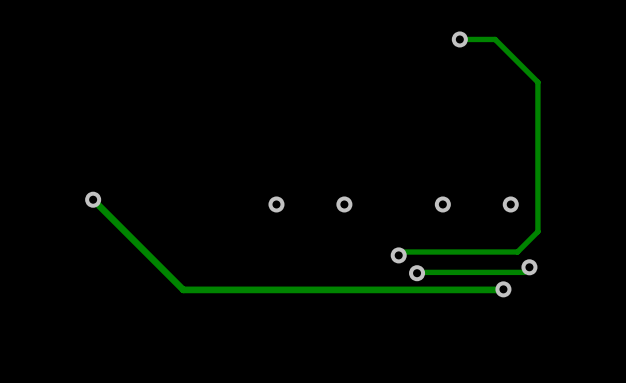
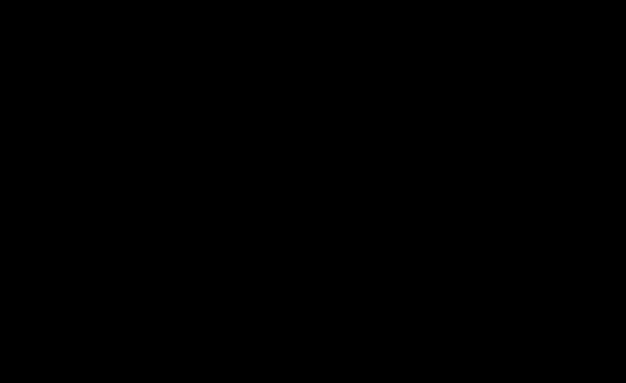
via: (459, 39) -> none
track: (459, 41) (459, 39) (495, 39) (537, 82) (537, 231) (517, 252) (402, 252) (398, 255) -> none
track: (93, 199) (183, 289) (503, 289) -> none
via: (93, 199) -> none
via: (276, 204) -> none
via: (344, 204) -> none
via: (442, 204) -> none
via: (510, 204) -> none
via: (398, 255) -> none
via: (529, 267) -> none
track: (524, 272) (417, 273) -> none
via: (417, 273) -> none
via: (503, 289) -> none

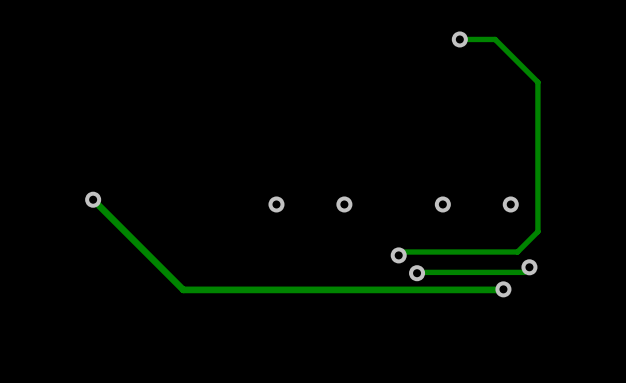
via: none -> (459, 39)
track: none -> (459, 41) (459, 39) (495, 39) (537, 82) (537, 231) (517, 252) (402, 252) (398, 255)
track: none -> (93, 199) (183, 289) (503, 289)
via: none -> (93, 199)
via: none -> (276, 204)
via: none -> (344, 204)
via: none -> (442, 204)
via: none -> (510, 204)
via: none -> (398, 255)
via: none -> (529, 267)
track: none -> (524, 272) (417, 273)
via: none -> (417, 273)
via: none -> (503, 289)

